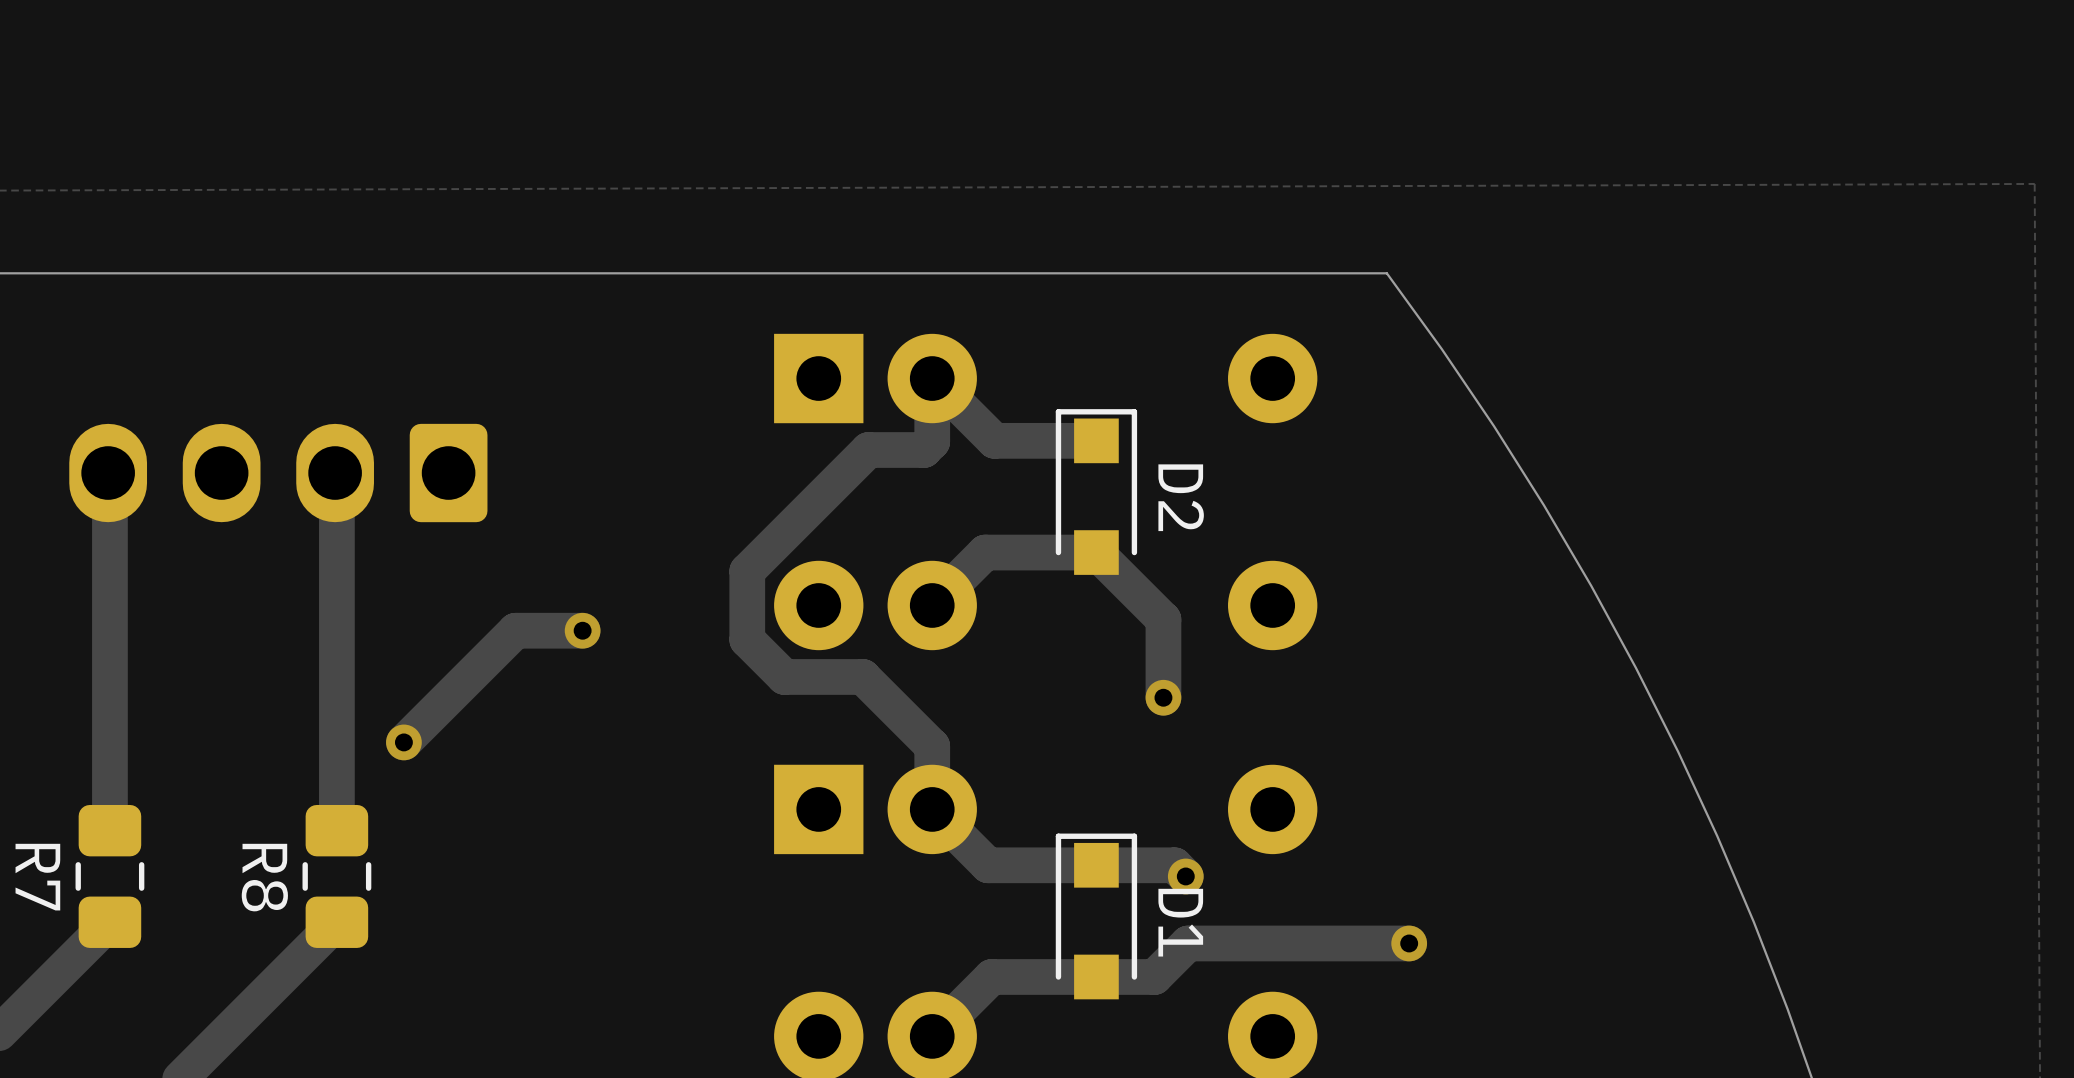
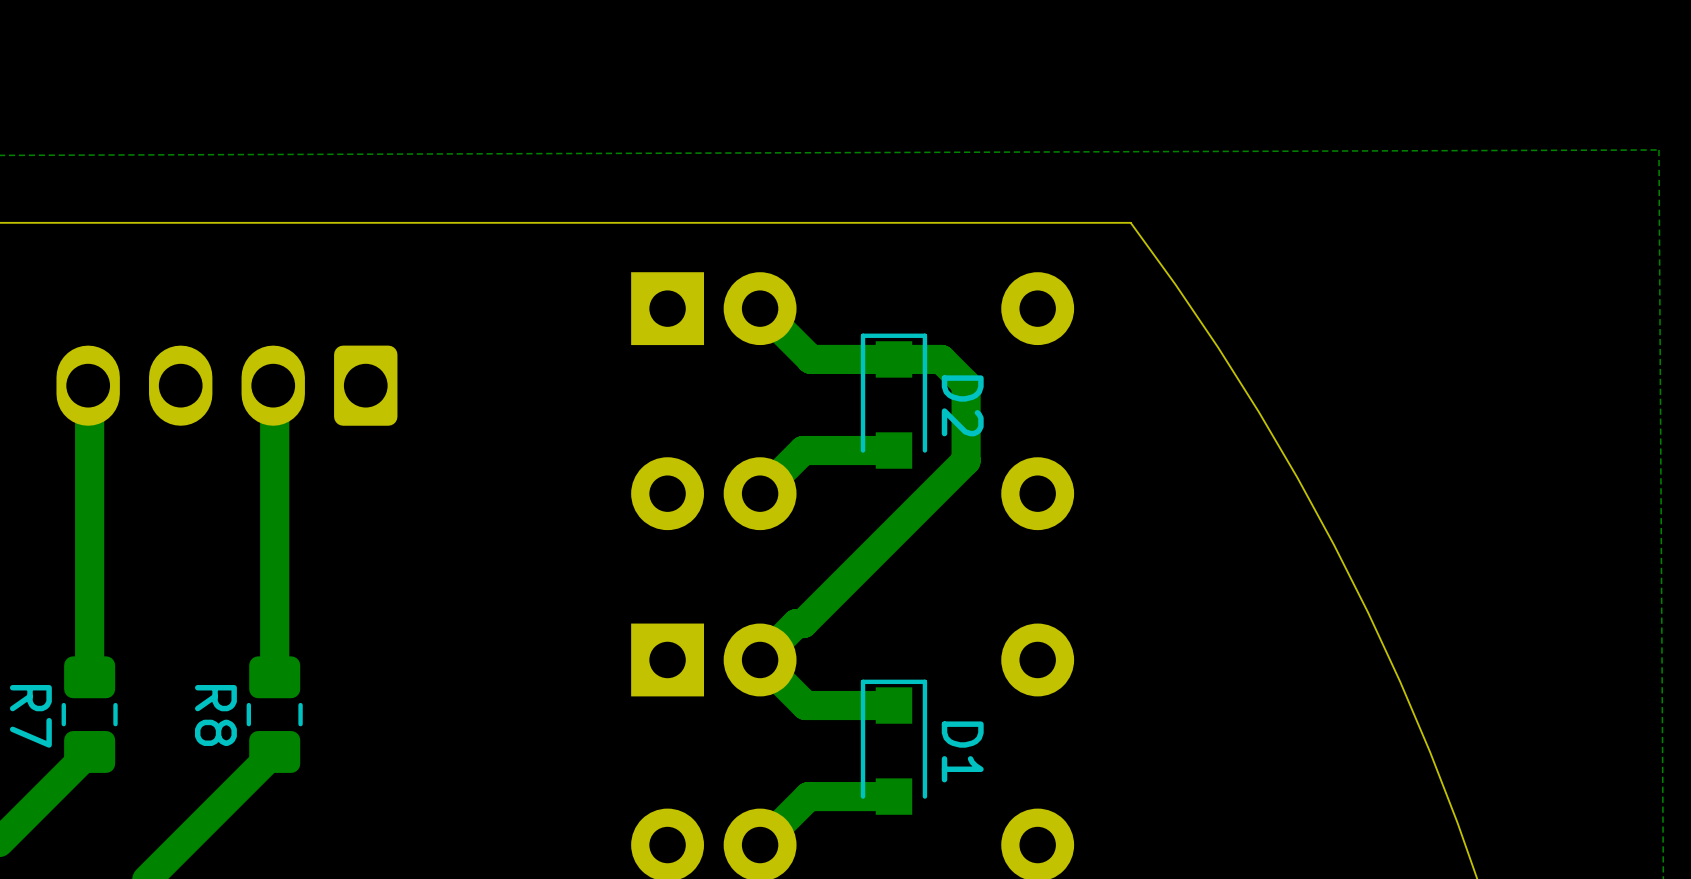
track: (932, 378) (932, 441) (923, 450) (868, 450) (747, 571) (747, 639) (784, 676) (862, 676) (932, 746) (932, 809) -> (893, 359) (941, 359) (966, 384) (966, 460) (803, 623) (796, 623) (760, 659)
track: (1096, 552) (1163, 619) (1163, 697) -> none
track: (582, 630) (515, 630) (403, 742) -> none
via: (582, 630) -> none
via: (1163, 697) -> none
via: (403, 742) -> none
track: (1096, 865) (1174, 865) (1185, 876) -> none
via: (1185, 876) -> none
track: (1409, 943) (1188, 943) (1154, 976) (1096, 976) -> none
via: (1409, 943) -> none

